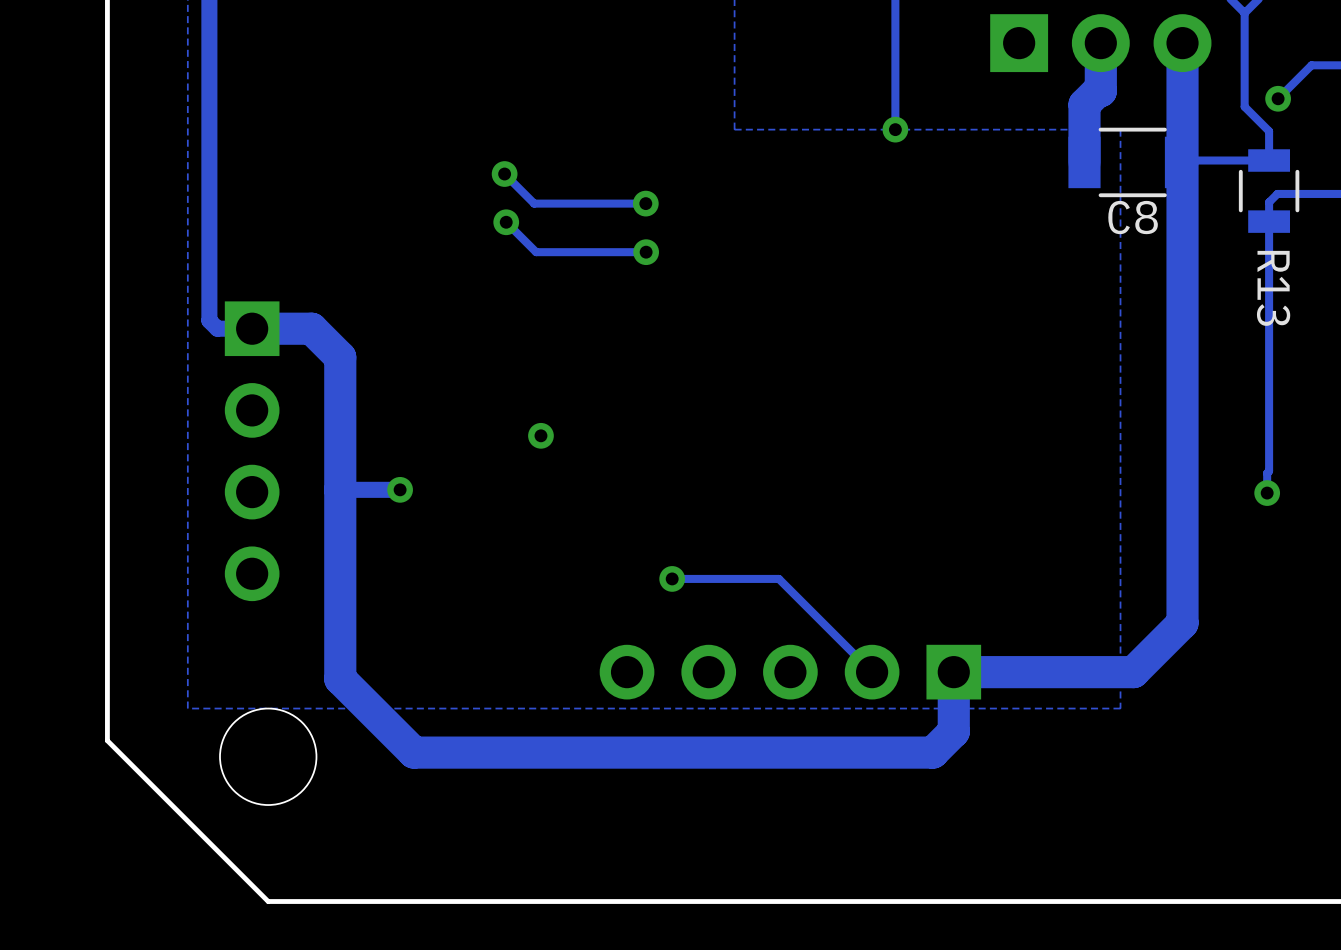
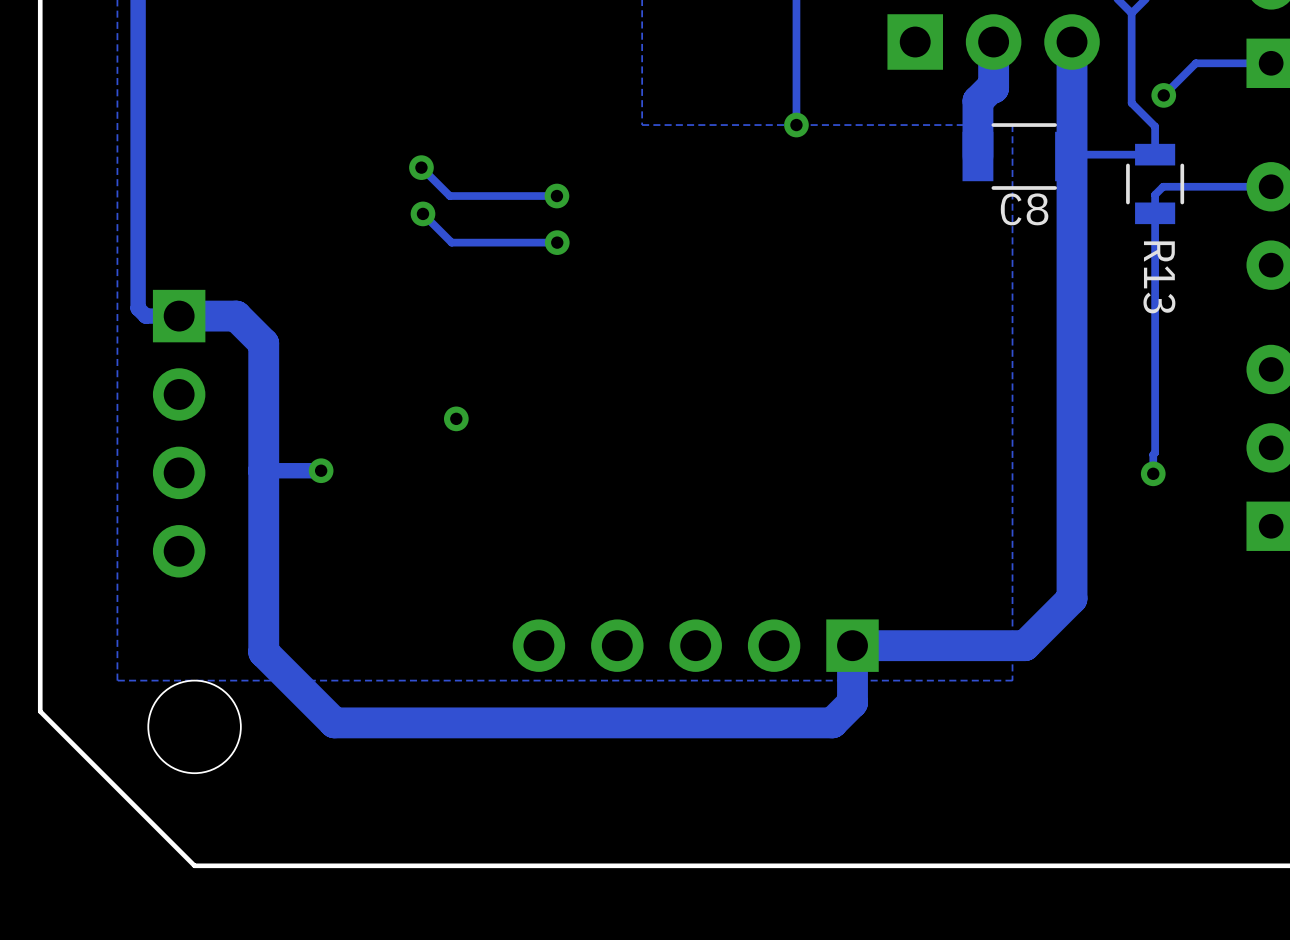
track: (672, 578) (778, 578) (872, 672) -> none
via: (672, 578) -> none

